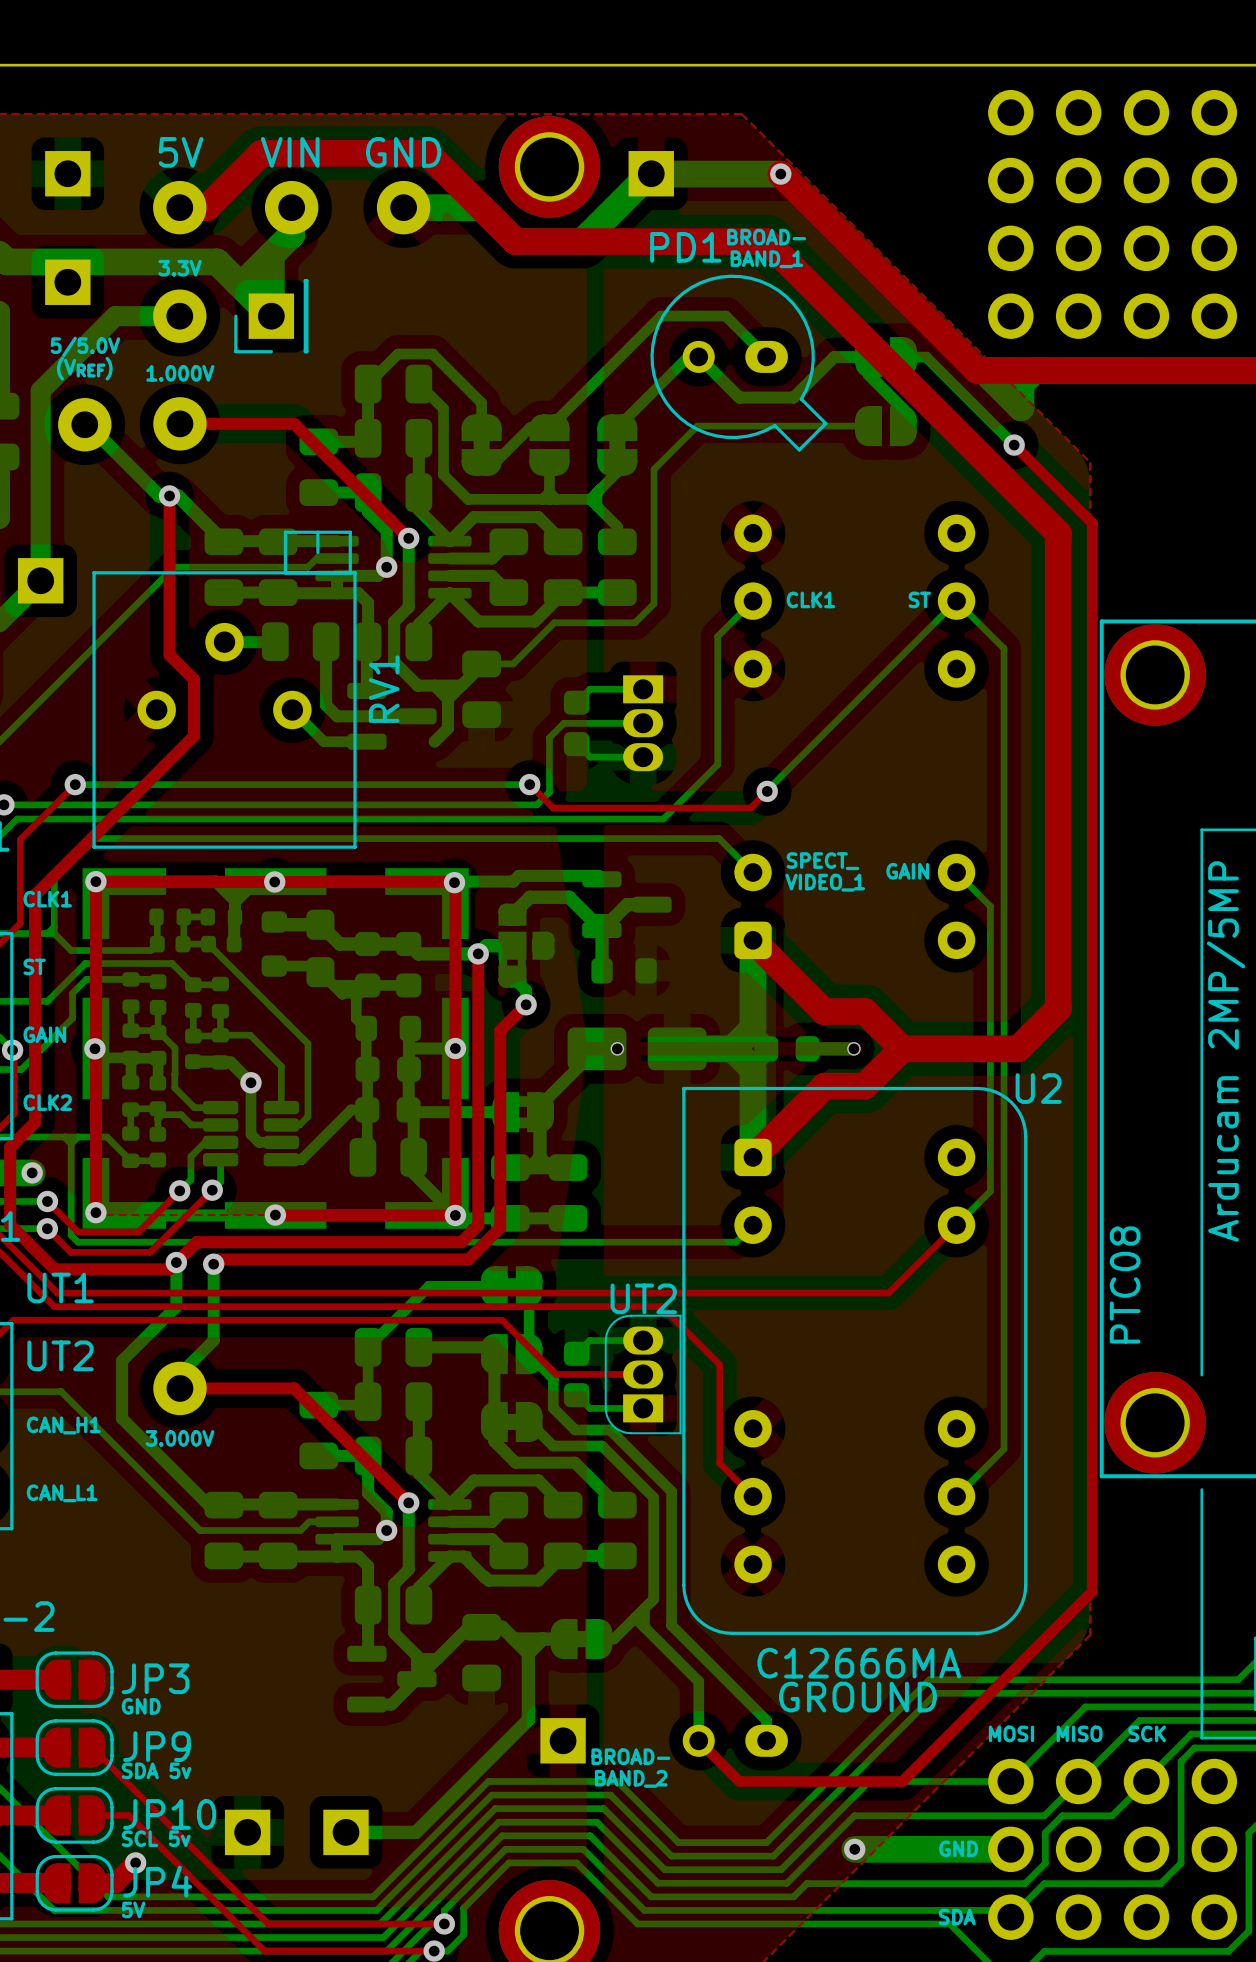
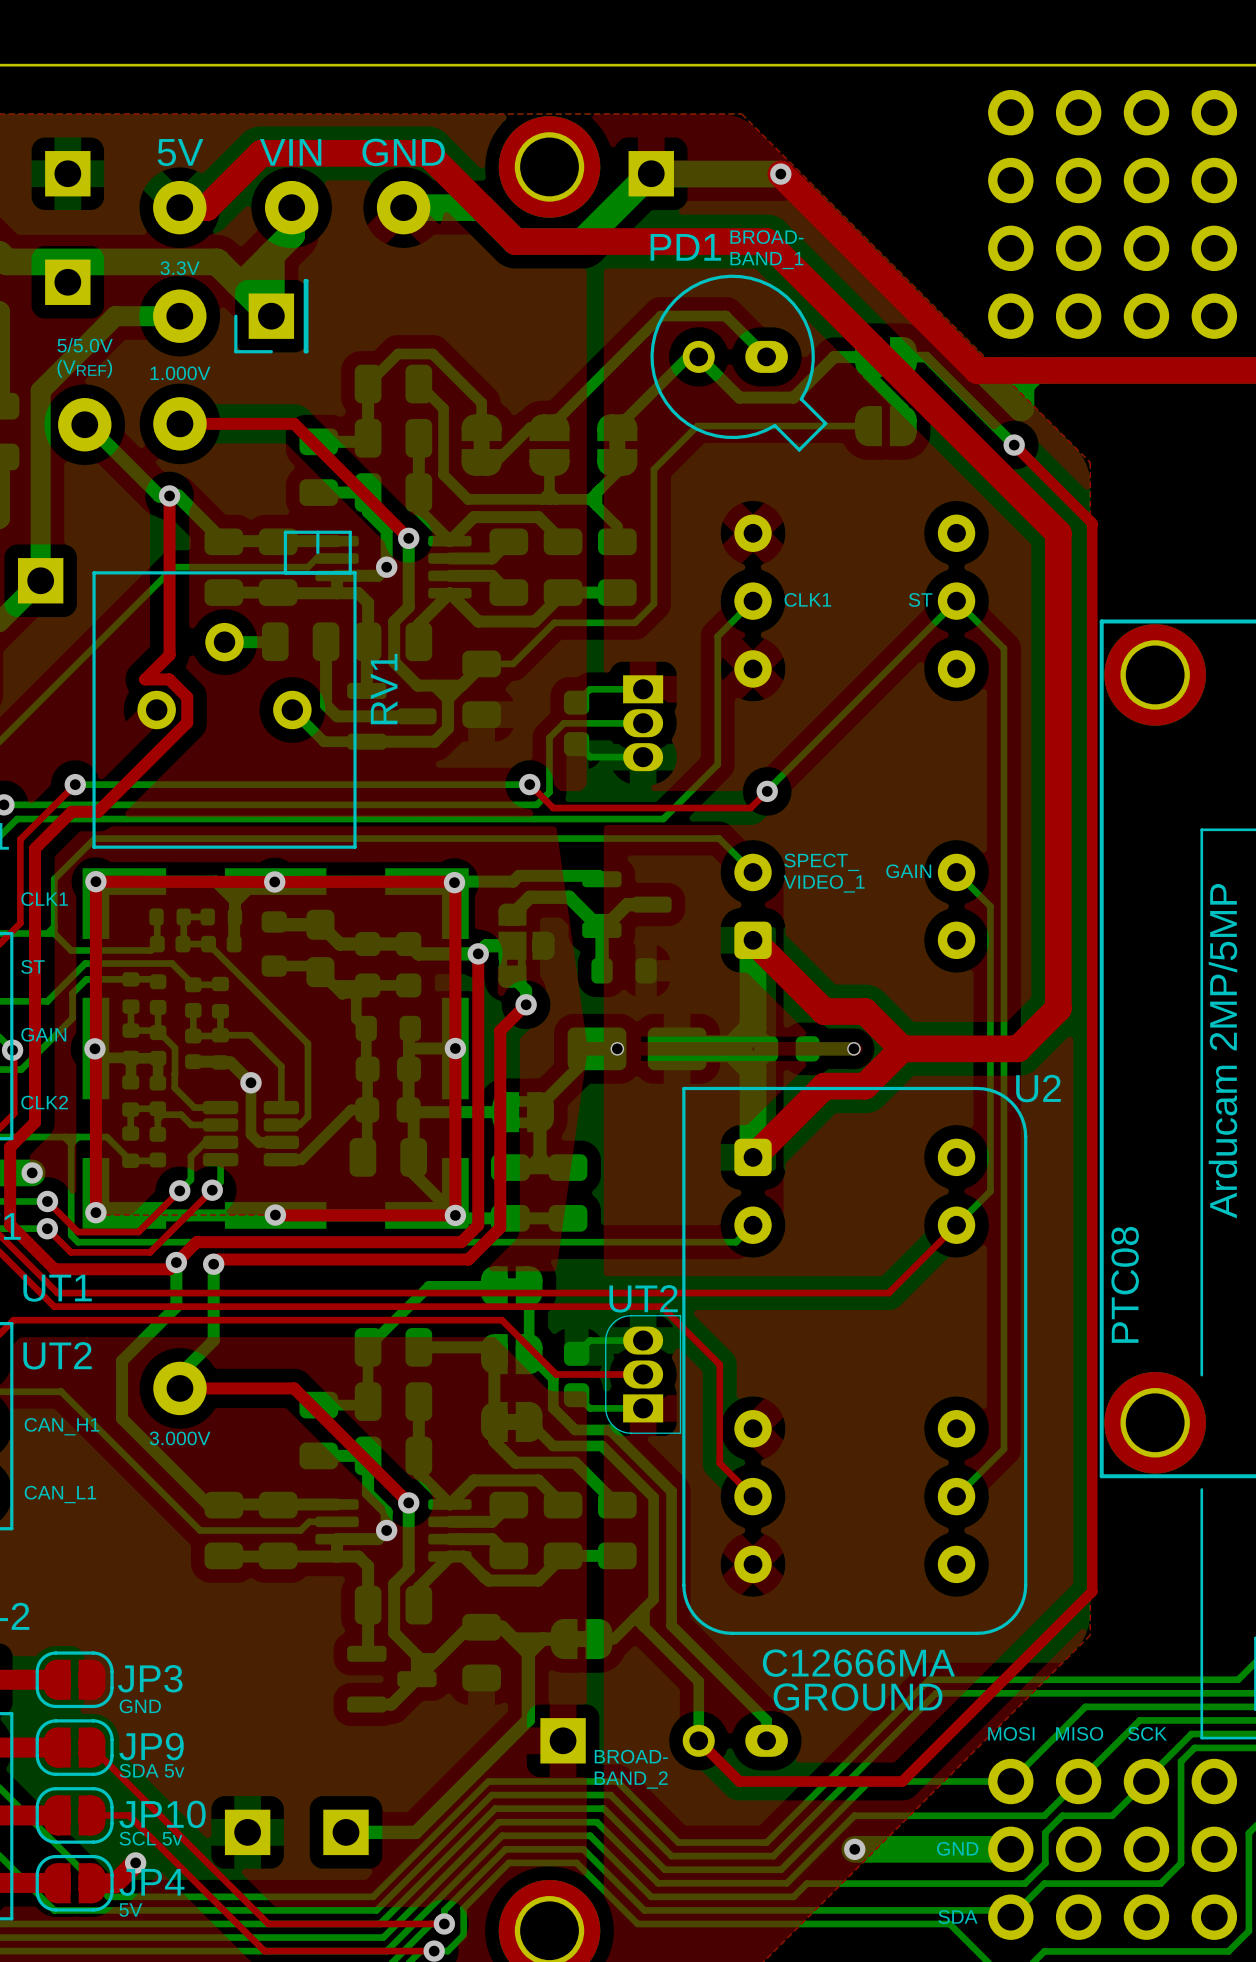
top track: (169, 655) (193, 679) (193, 736) (35, 895) -> (169, 655) (145, 679) (169, 679) (187, 697) (187, 722) (98, 811) (71, 811) (35, 848) (35, 895)
bottom track: none -> (366, 741) (434, 741)

